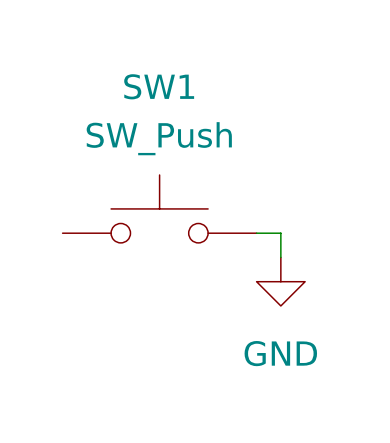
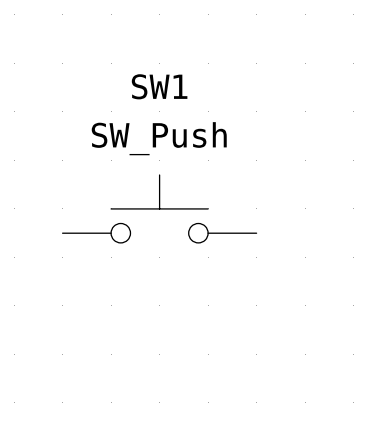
wire: (256, 233) (280, 233) (280, 257) -> none
power symbol: GND (280, 281) -> none

